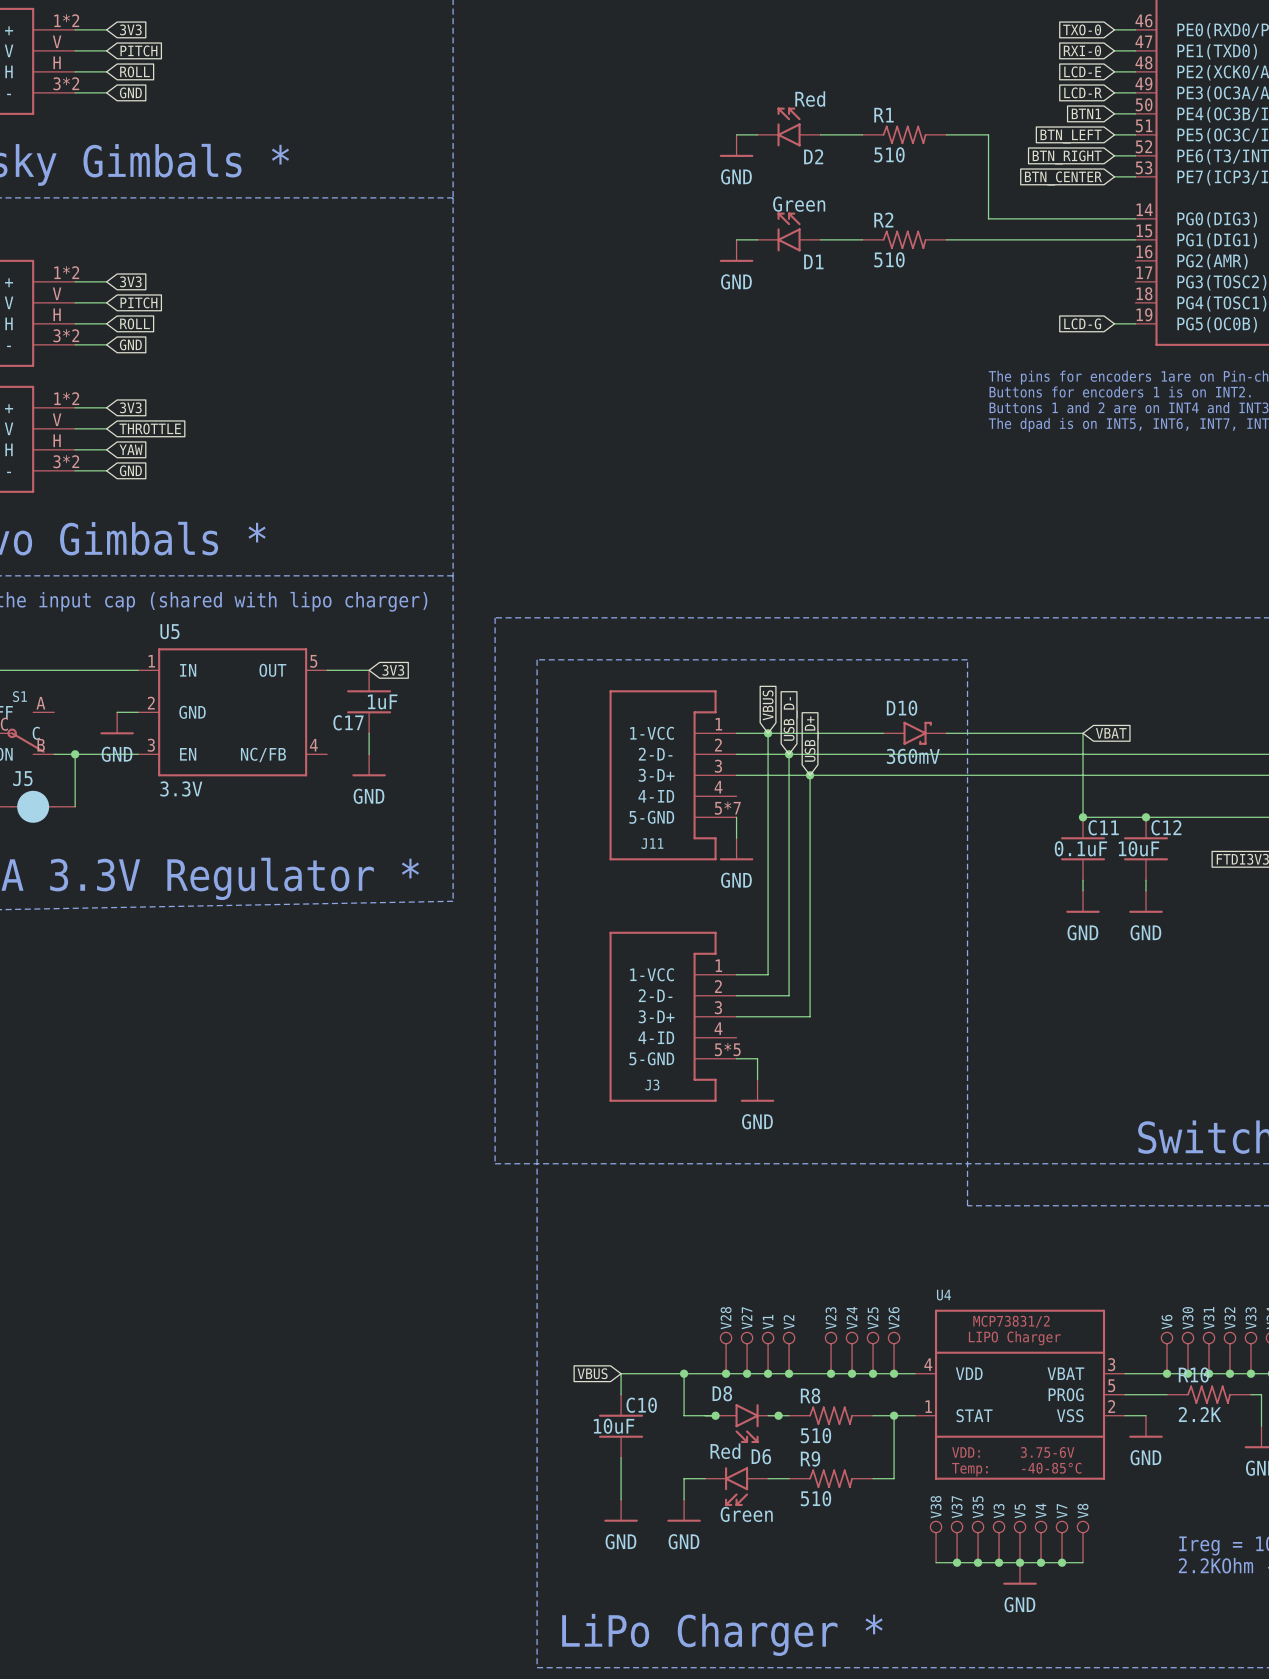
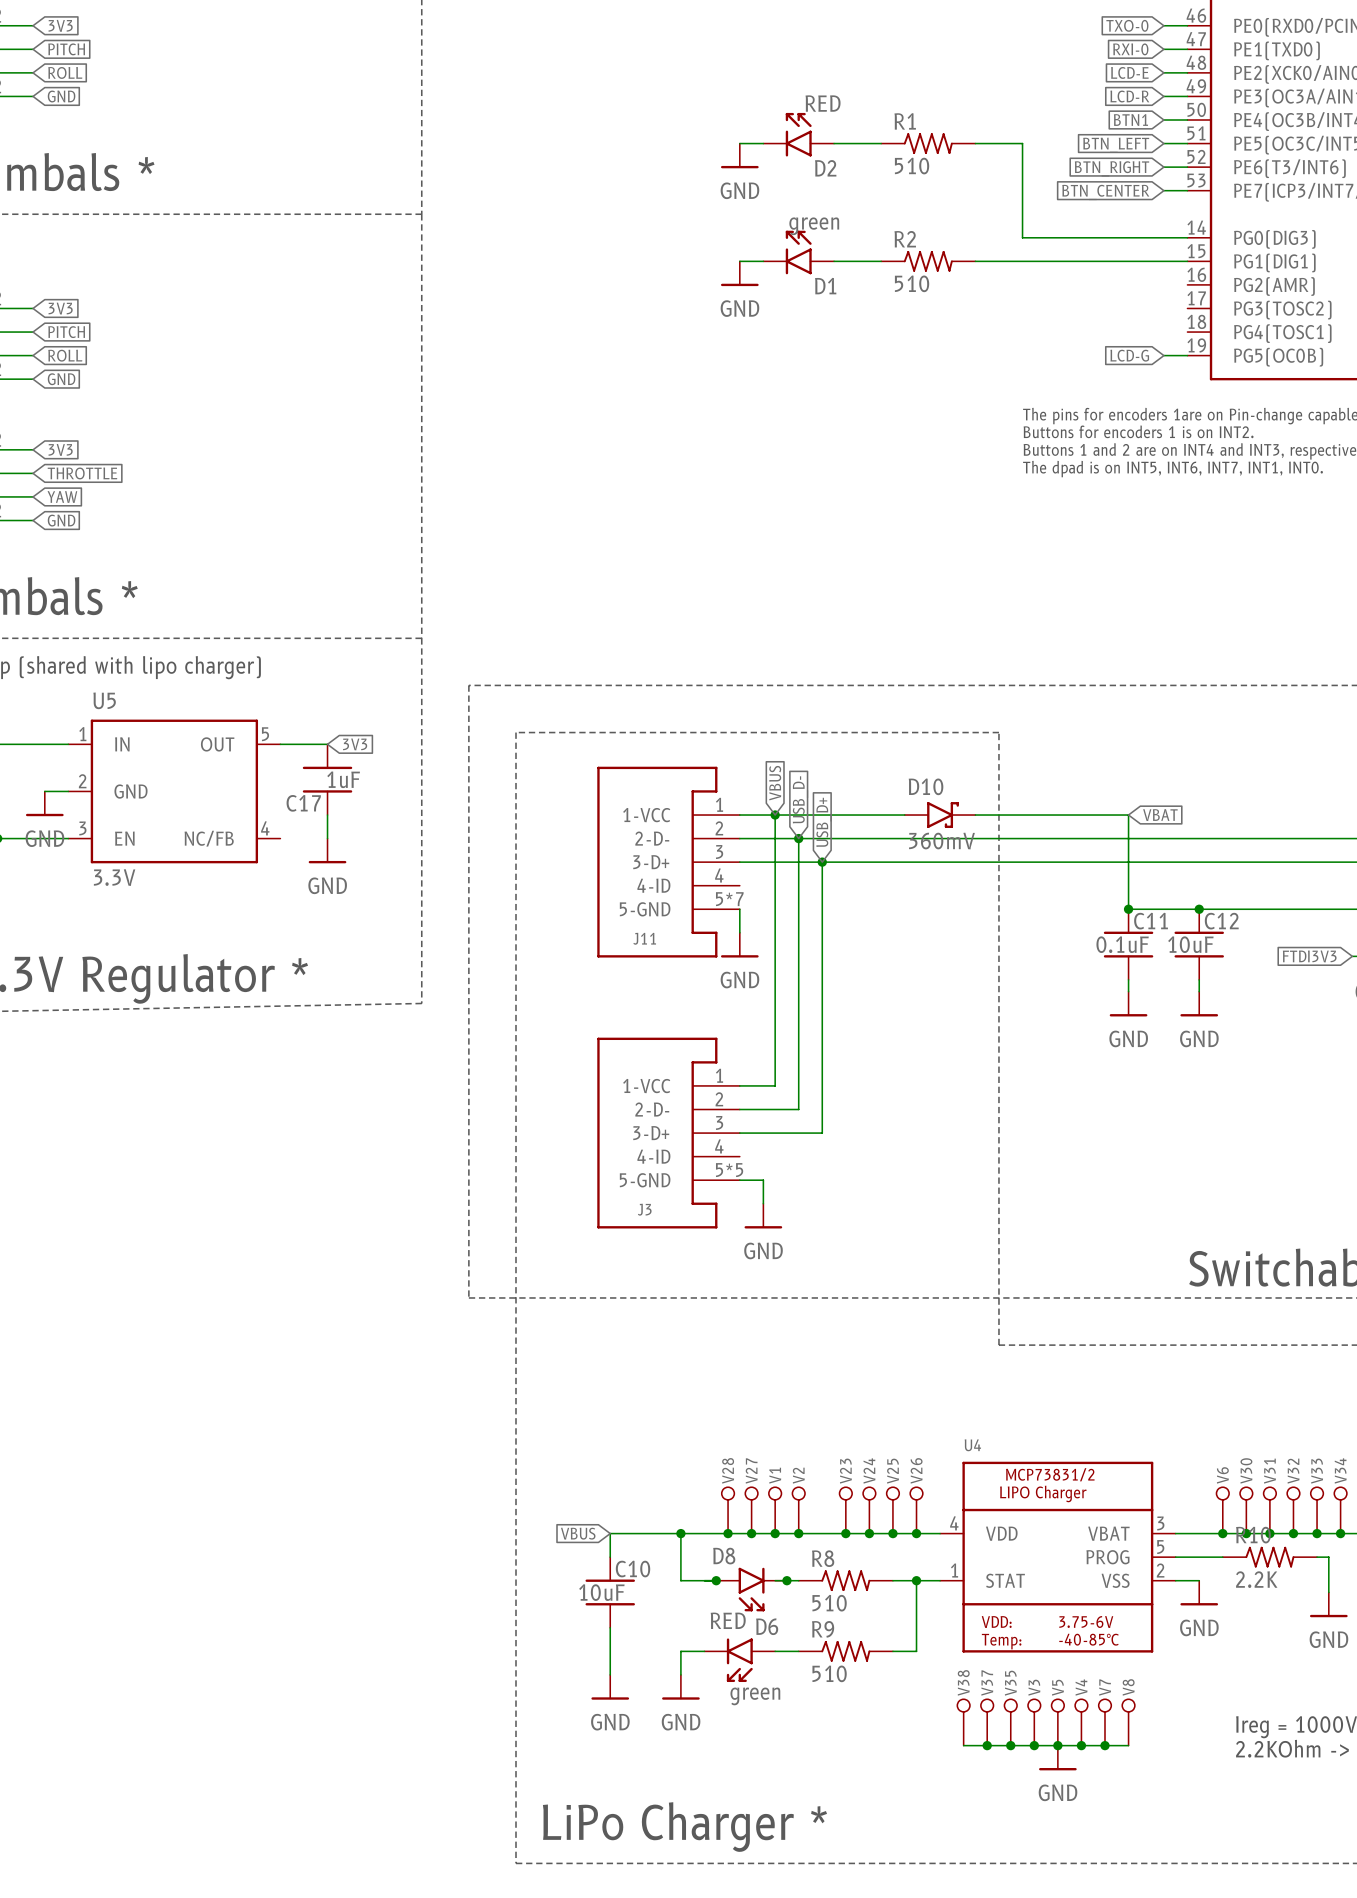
D2 value: Red (810, 99) -> RED (823, 103)
D1 value: Green (799, 204) -> green (814, 226)
D8 value: Red (725, 1451) -> RED (728, 1620)
D6 value: Green (746, 1514) -> green (755, 1696)

